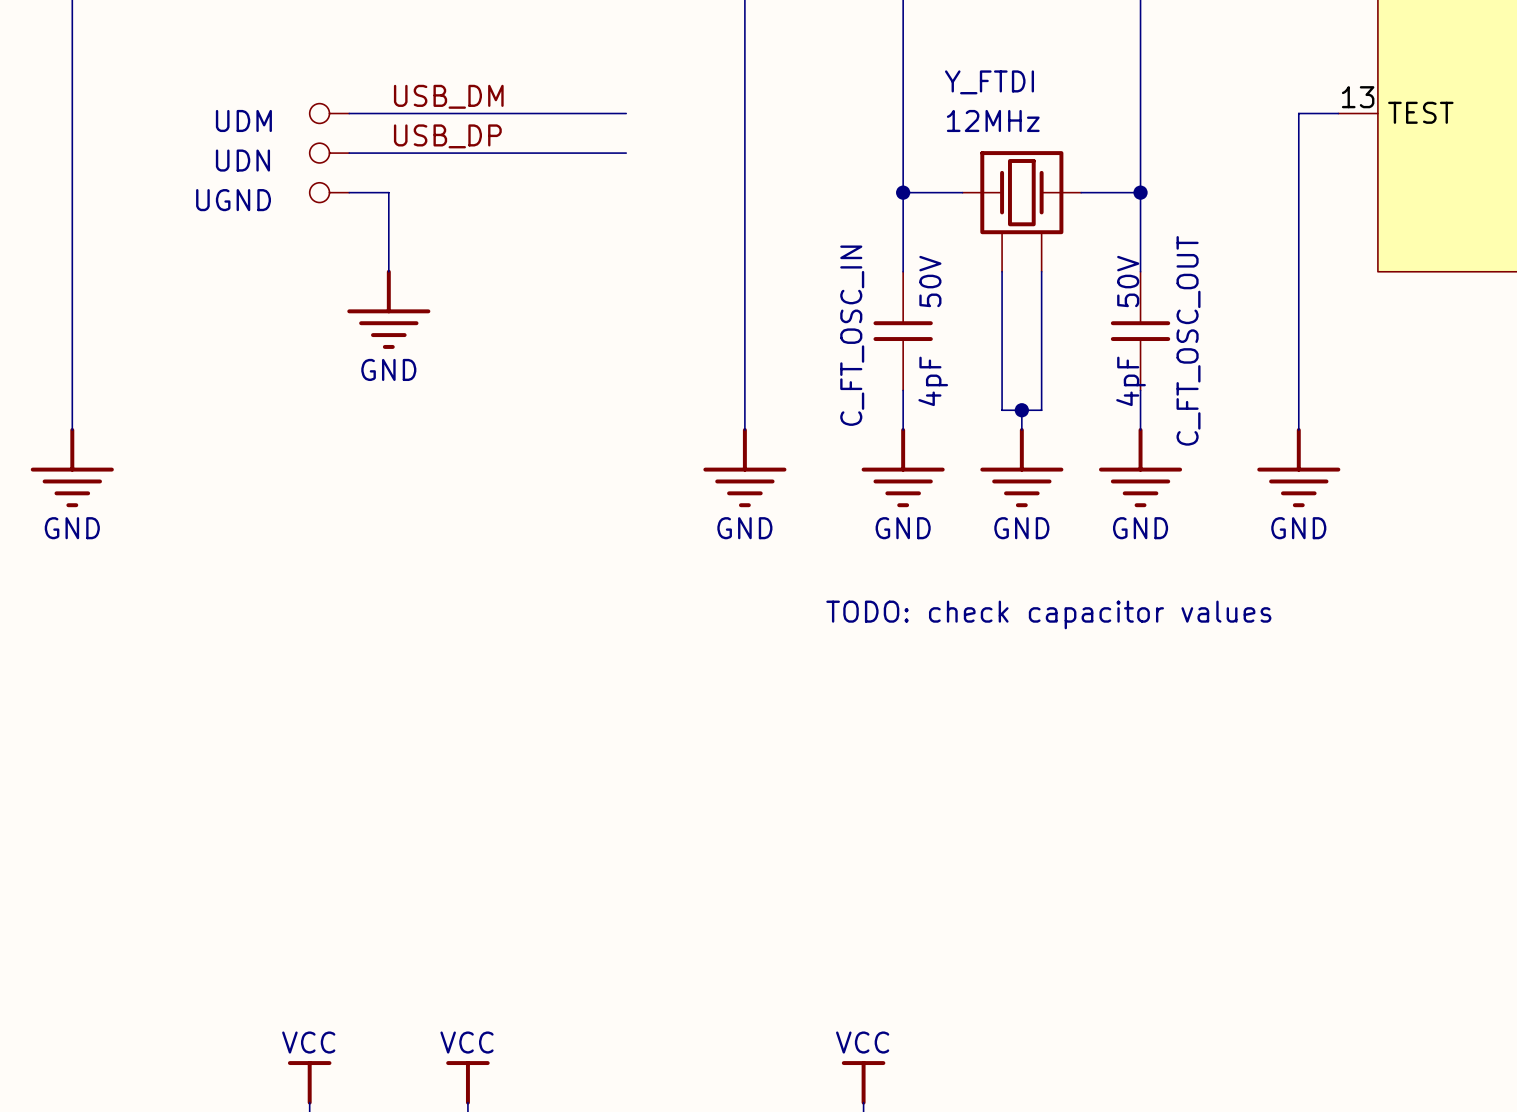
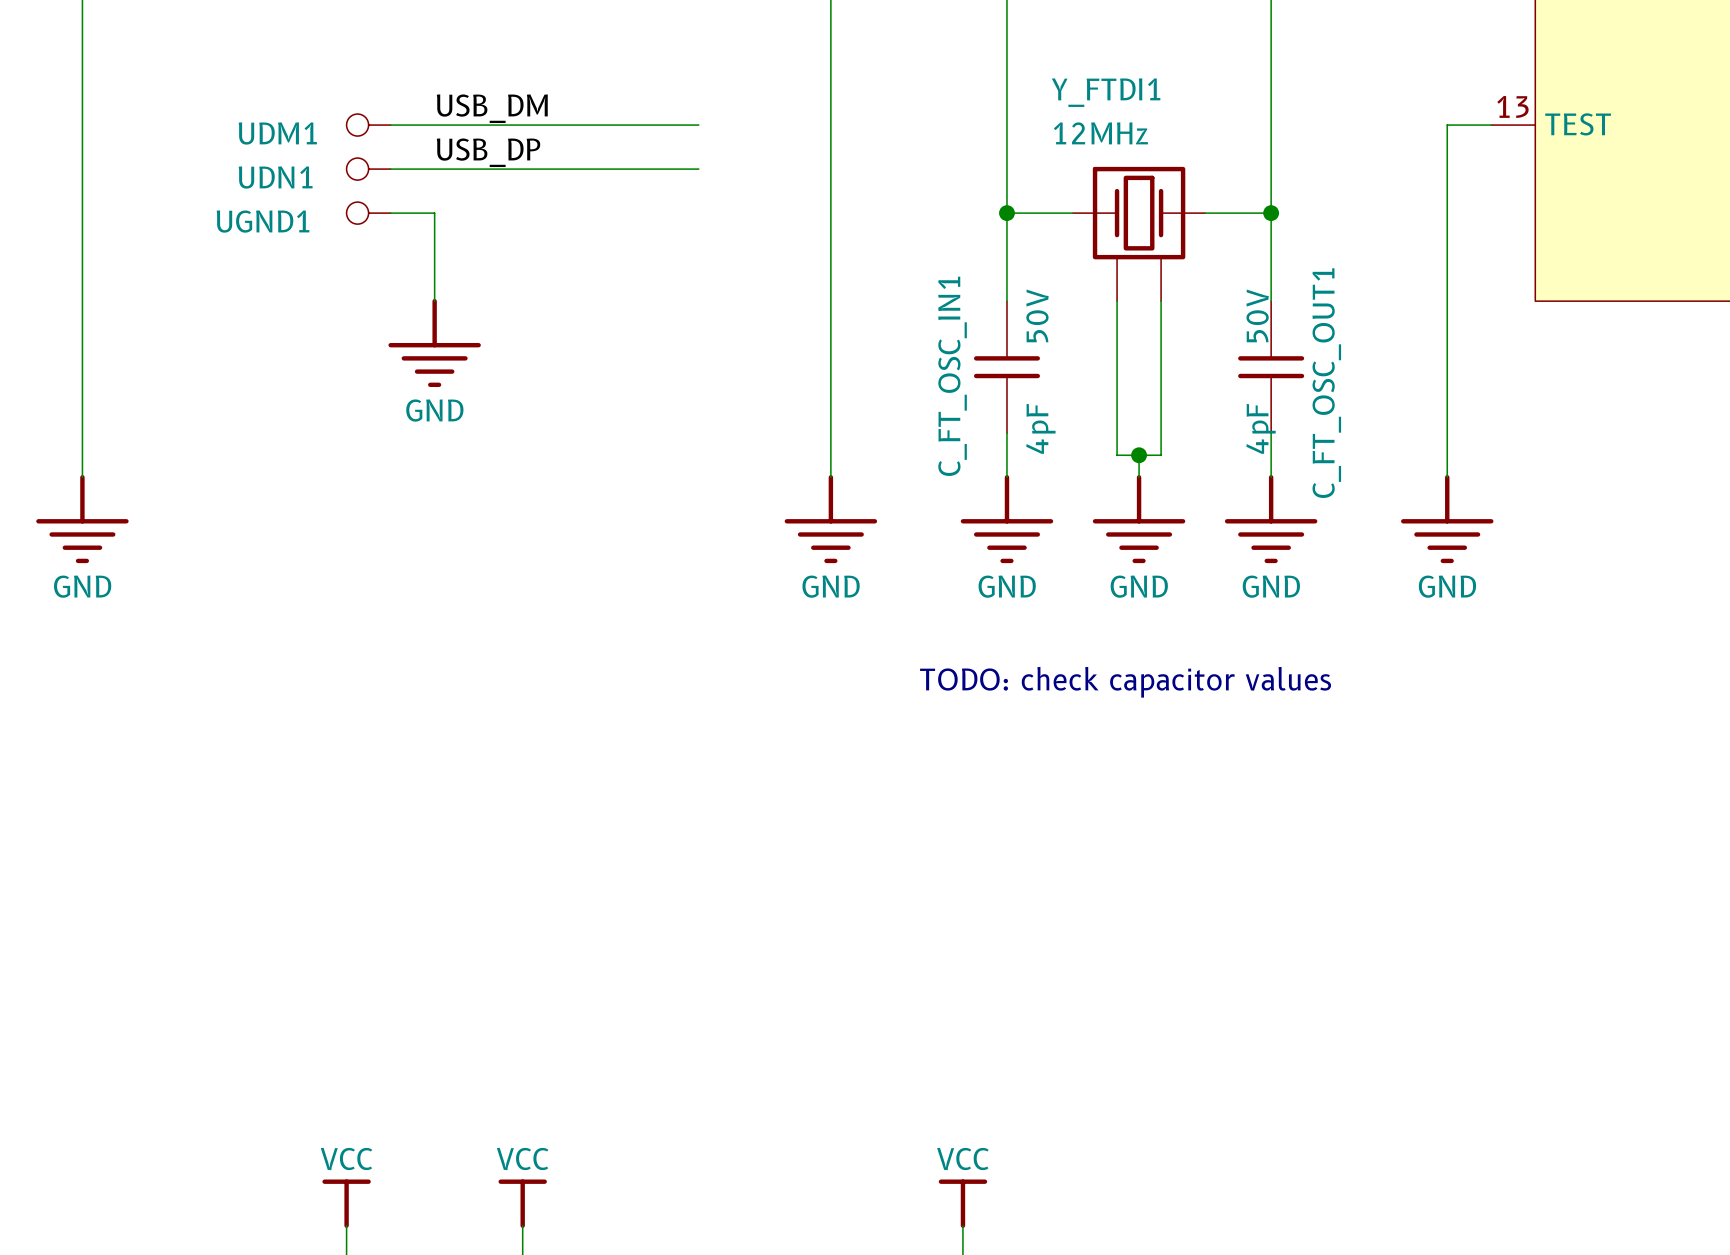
Y_FTDI name: Y_FTDI (989, 82) -> Y_FTDI1 (1106, 92)
UDM name: UDM (243, 120) -> UDM1 (277, 133)
UDN name: UDN (242, 160) -> UDN1 (275, 177)
UGND name: UGND (233, 200) -> UGND1 (263, 221)
C_FT_OSC_IN name: C_FT_OSC_IN (852, 335) -> C_FT_OSC_IN1 (952, 376)
C_FT_OSC_OUT name: C_FT_OSC_OUT (1188, 340) -> C_FT_OSC_OUT1 (1326, 383)

